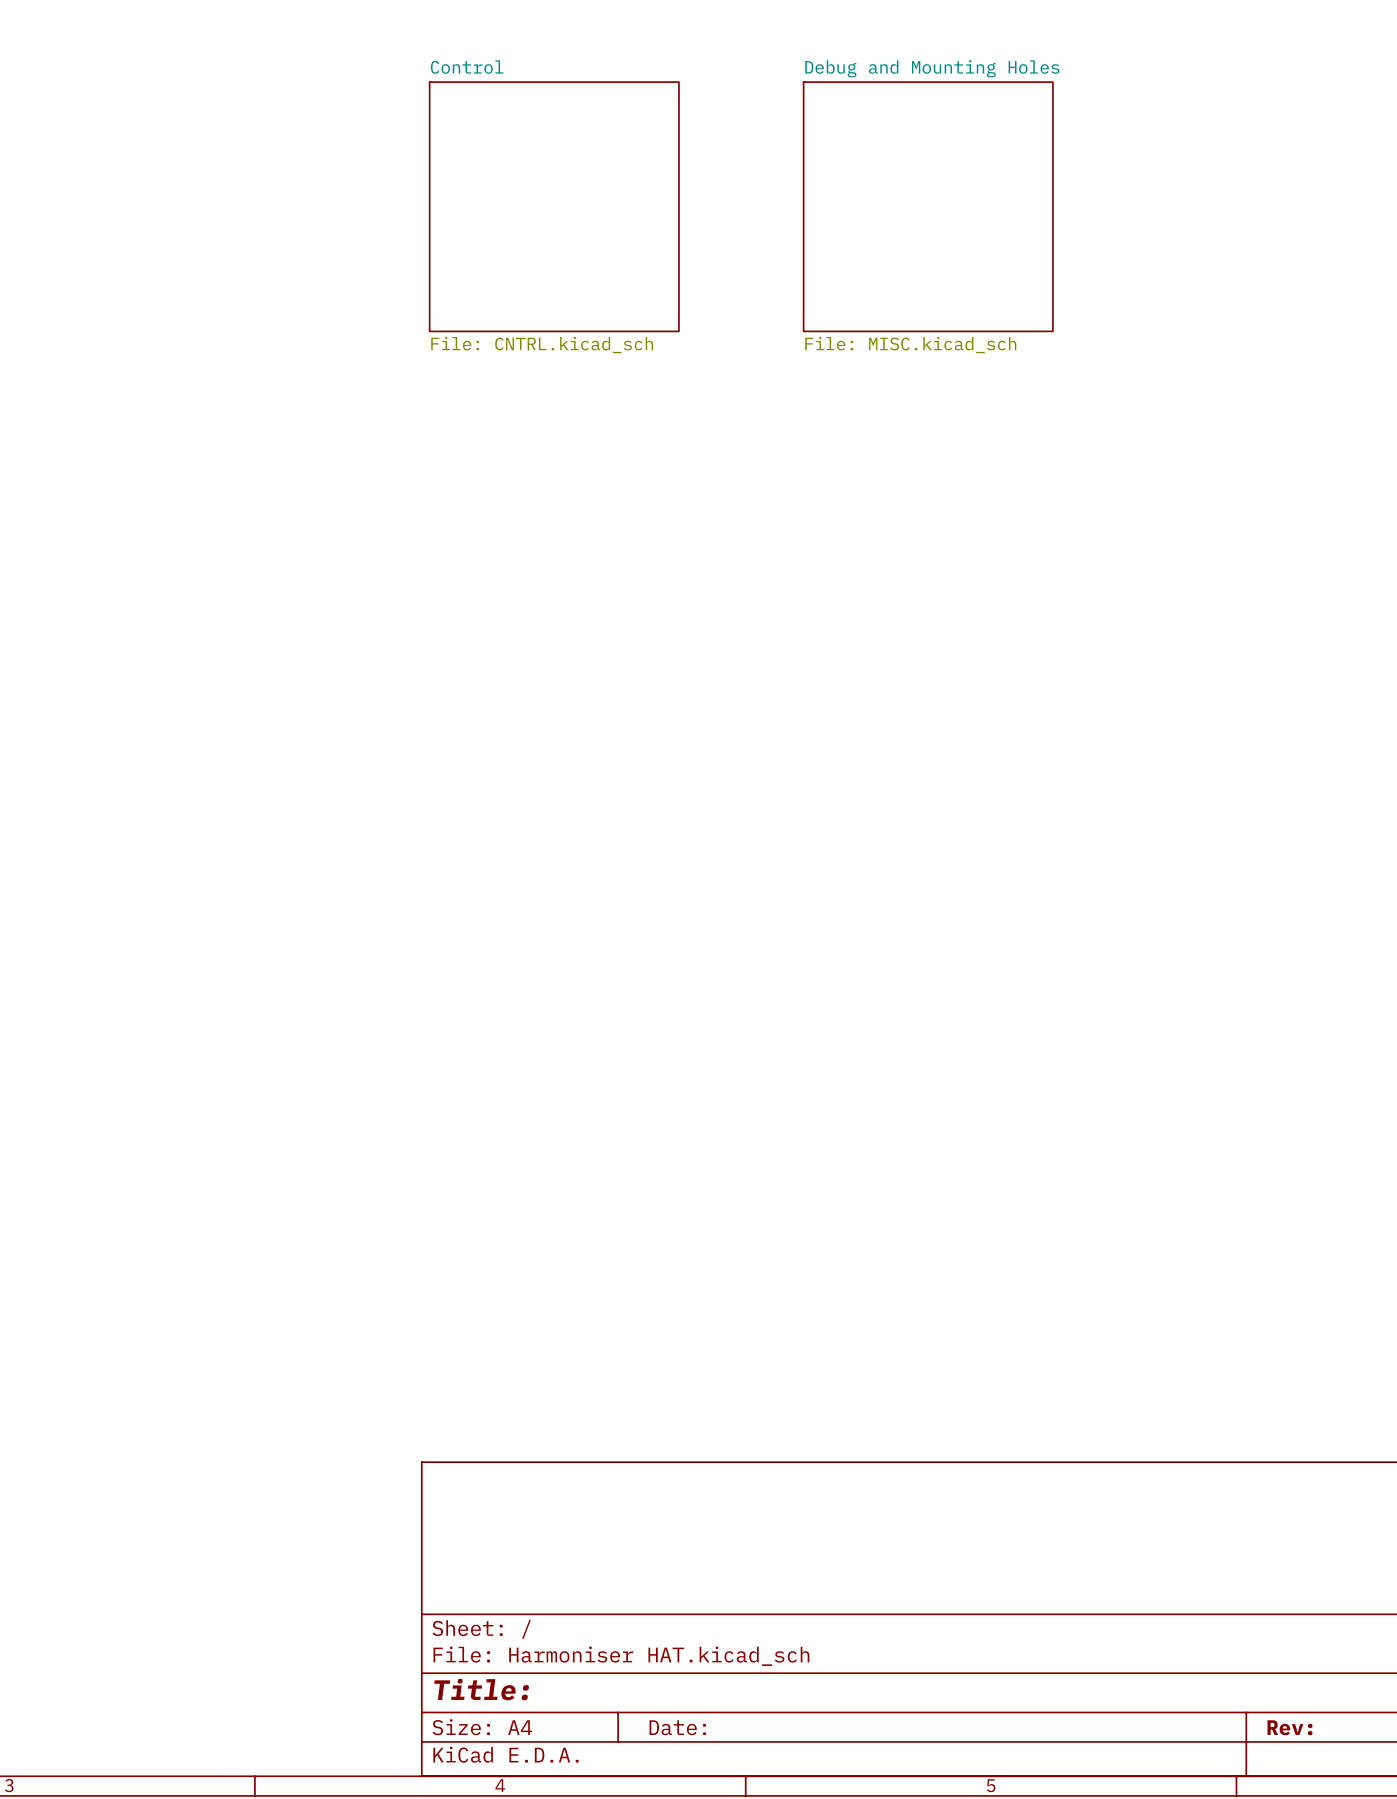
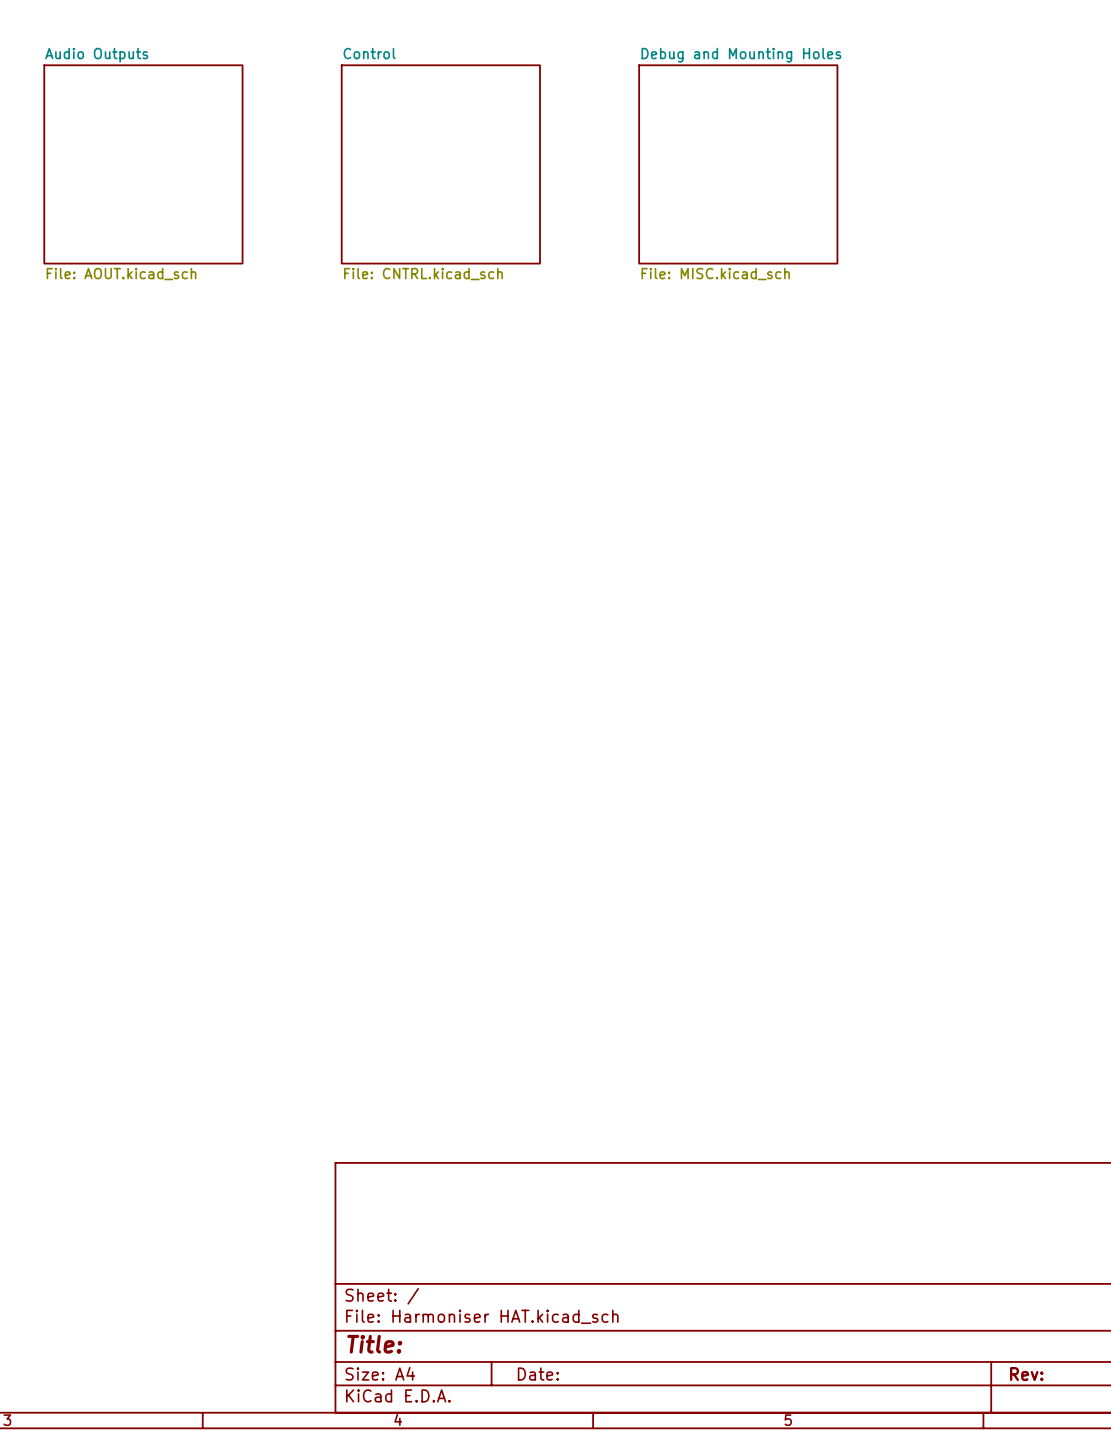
sheet Audio Outputs: none -> File: AOUT.kicad_sch (143, 164)

